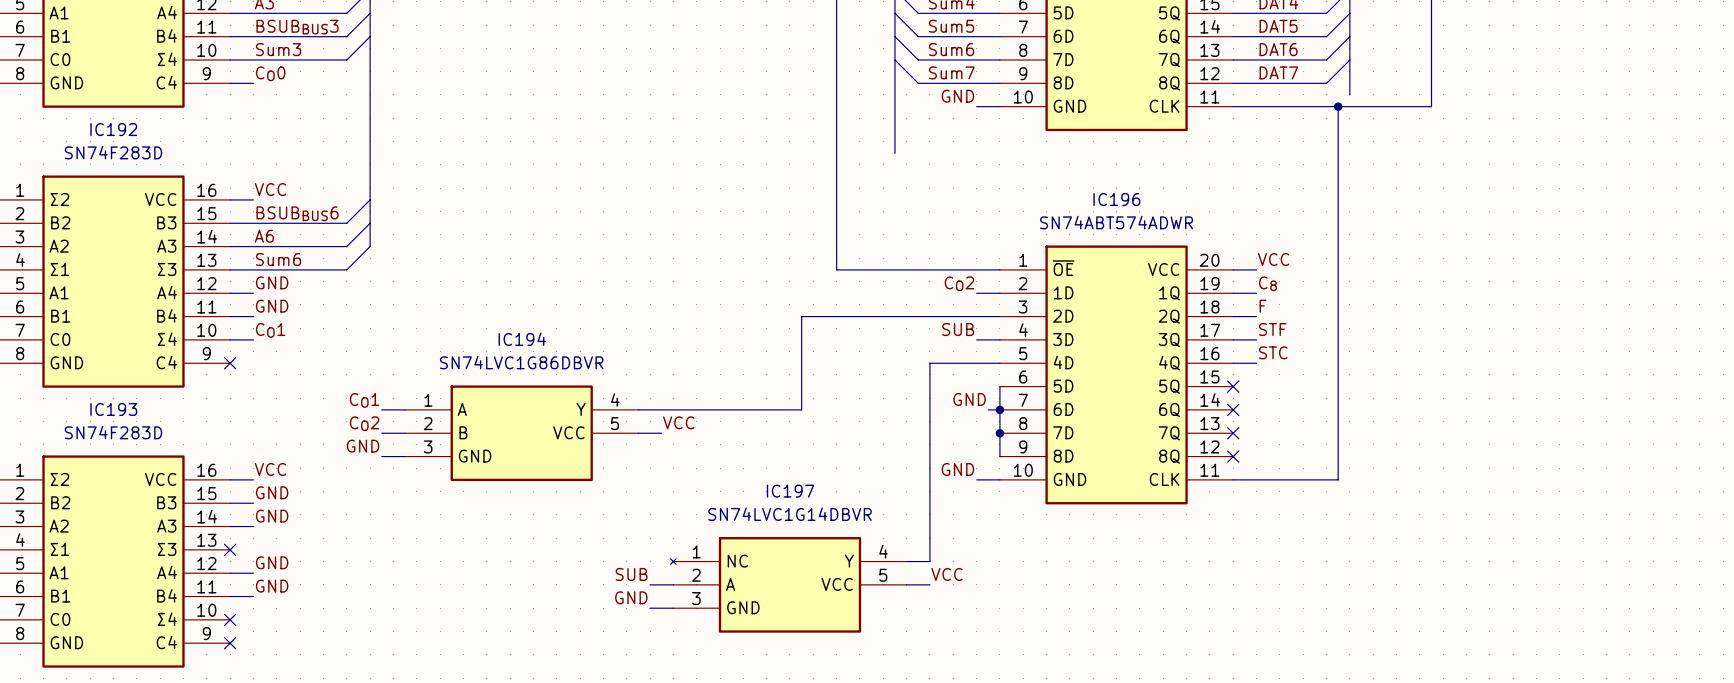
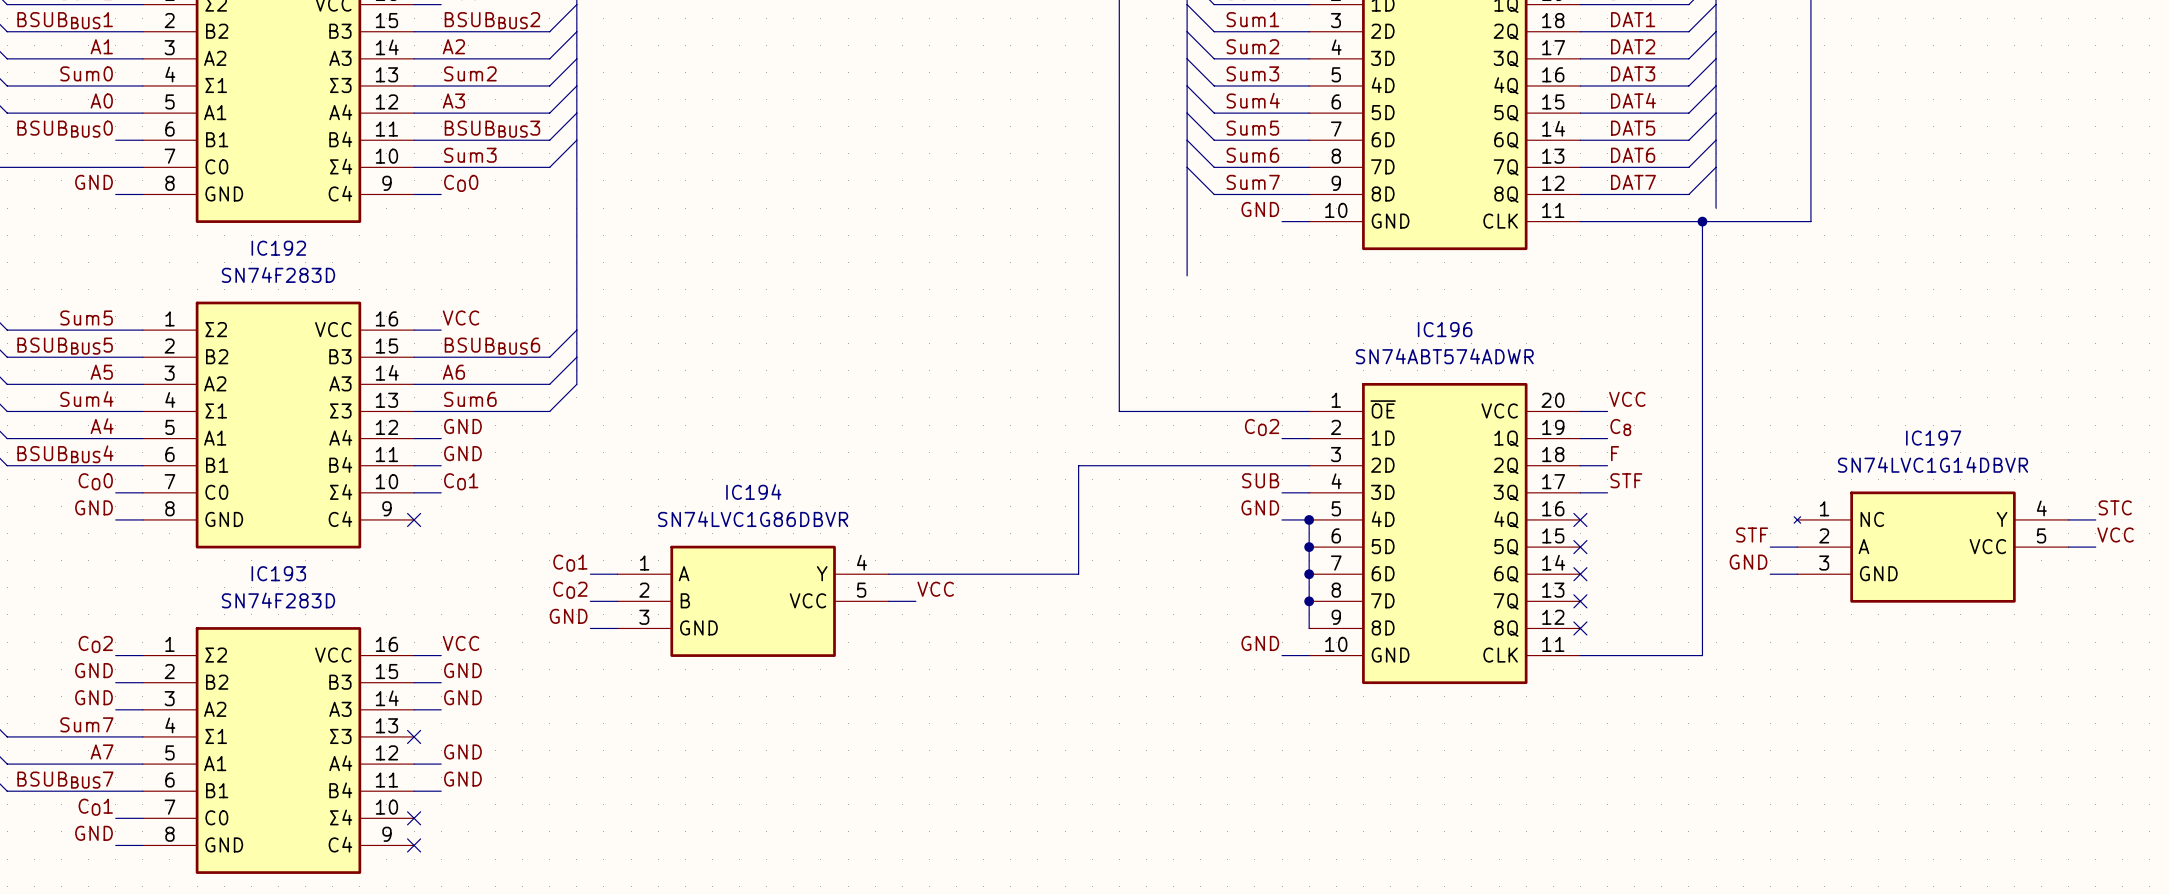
label: STC (1273, 352) -> none
label: none -> STC (2115, 507)
wire: (976, 363) (929, 363) (929, 561) (906, 561) -> none
wire: none -> (1309, 519) (1309, 547)
junction: none -> (1309, 519)
wire: (1233, 363) (1256, 363) -> (1770, 547) (1797, 547)
no-connect mark: none -> (1580, 519)
wire: none -> (2068, 519) (2095, 519)
label: none -> STF (1752, 534)
label: none -> VCC (2115, 534)
junction: none -> (1309, 547)
wire: none -> (2068, 547) (2095, 547)
label position: GND (969, 399) -> GND (1260, 507)
label: none -> GND (1748, 562)
wire: (988, 409) (999, 409) -> none
wire: none -> (1770, 574) (1797, 574)
label: SUB (631, 574) -> none
label: VCC (946, 574) -> none
wire: (650, 584) (673, 584) -> none
IC197 position: (788, 584) -> (1931, 547)
wire: (906, 584) (929, 584) -> none
label: GND (631, 597) -> none
wire: (650, 608) (673, 608) -> none

